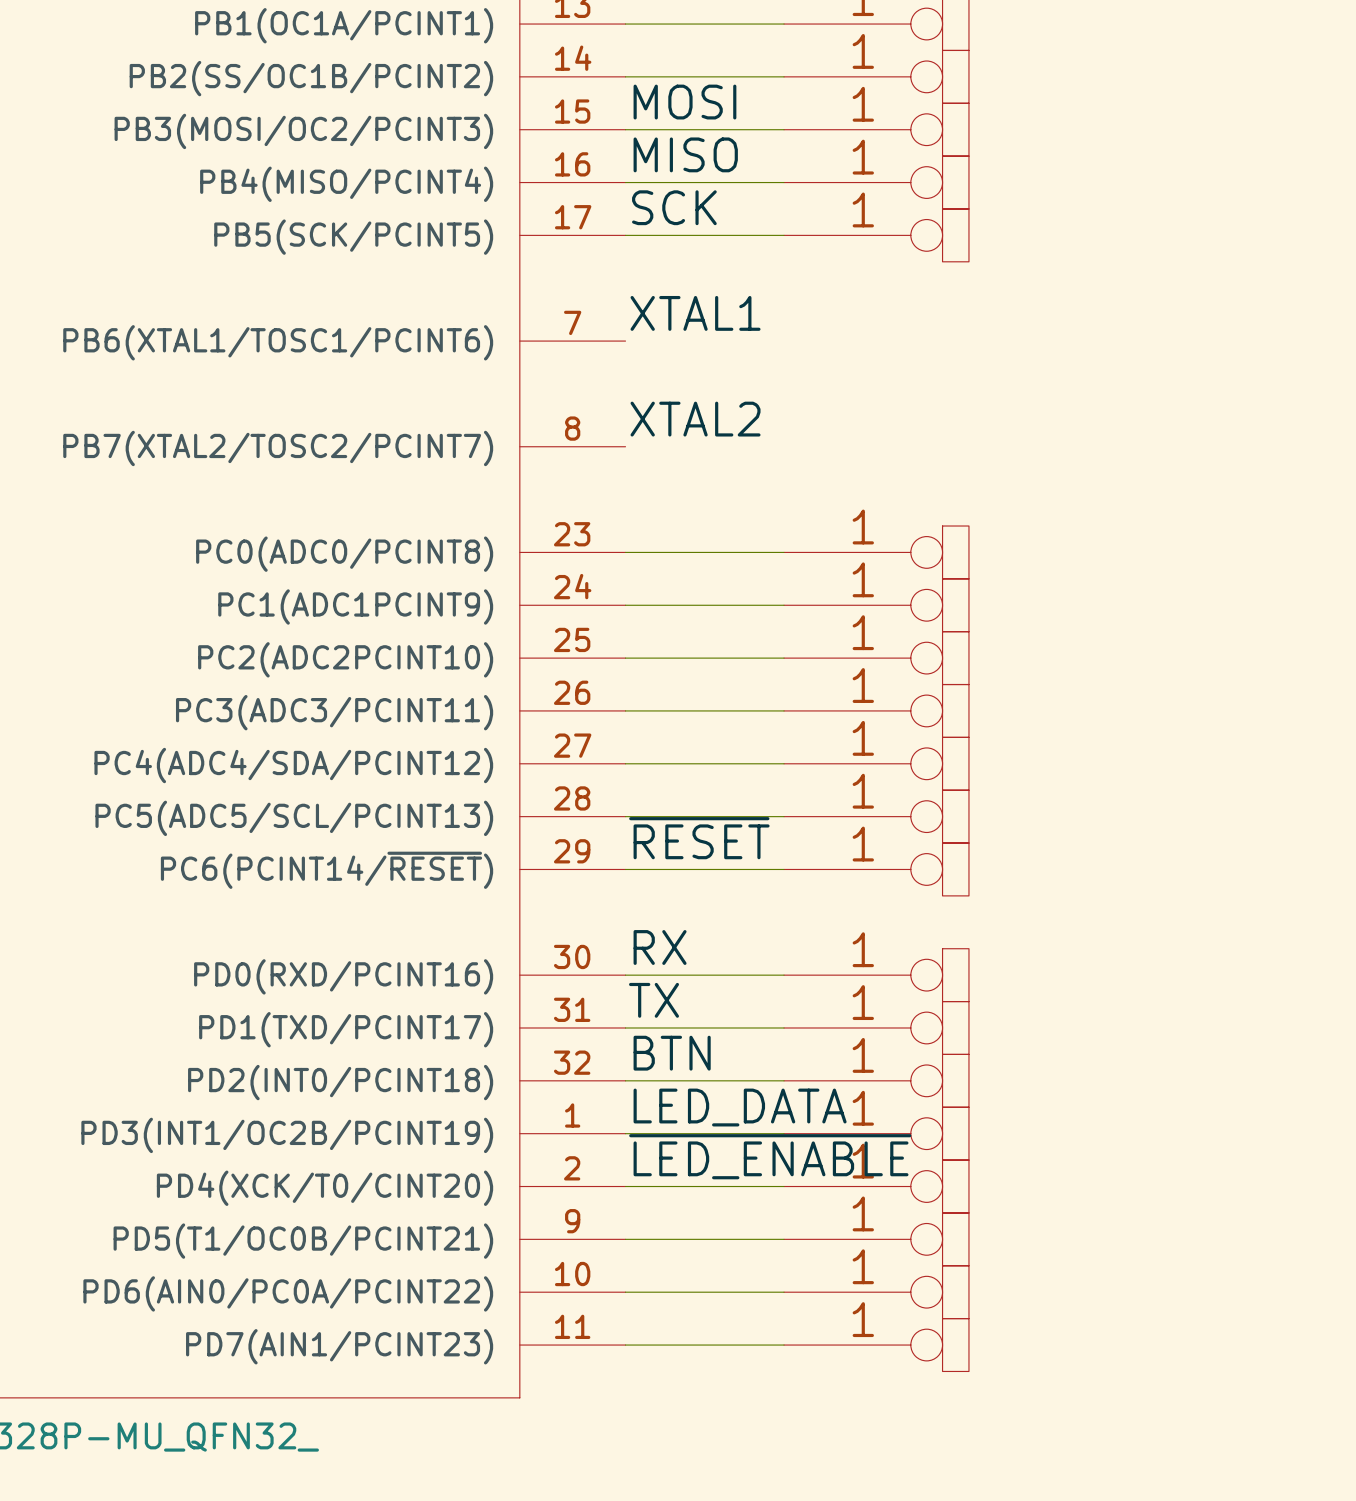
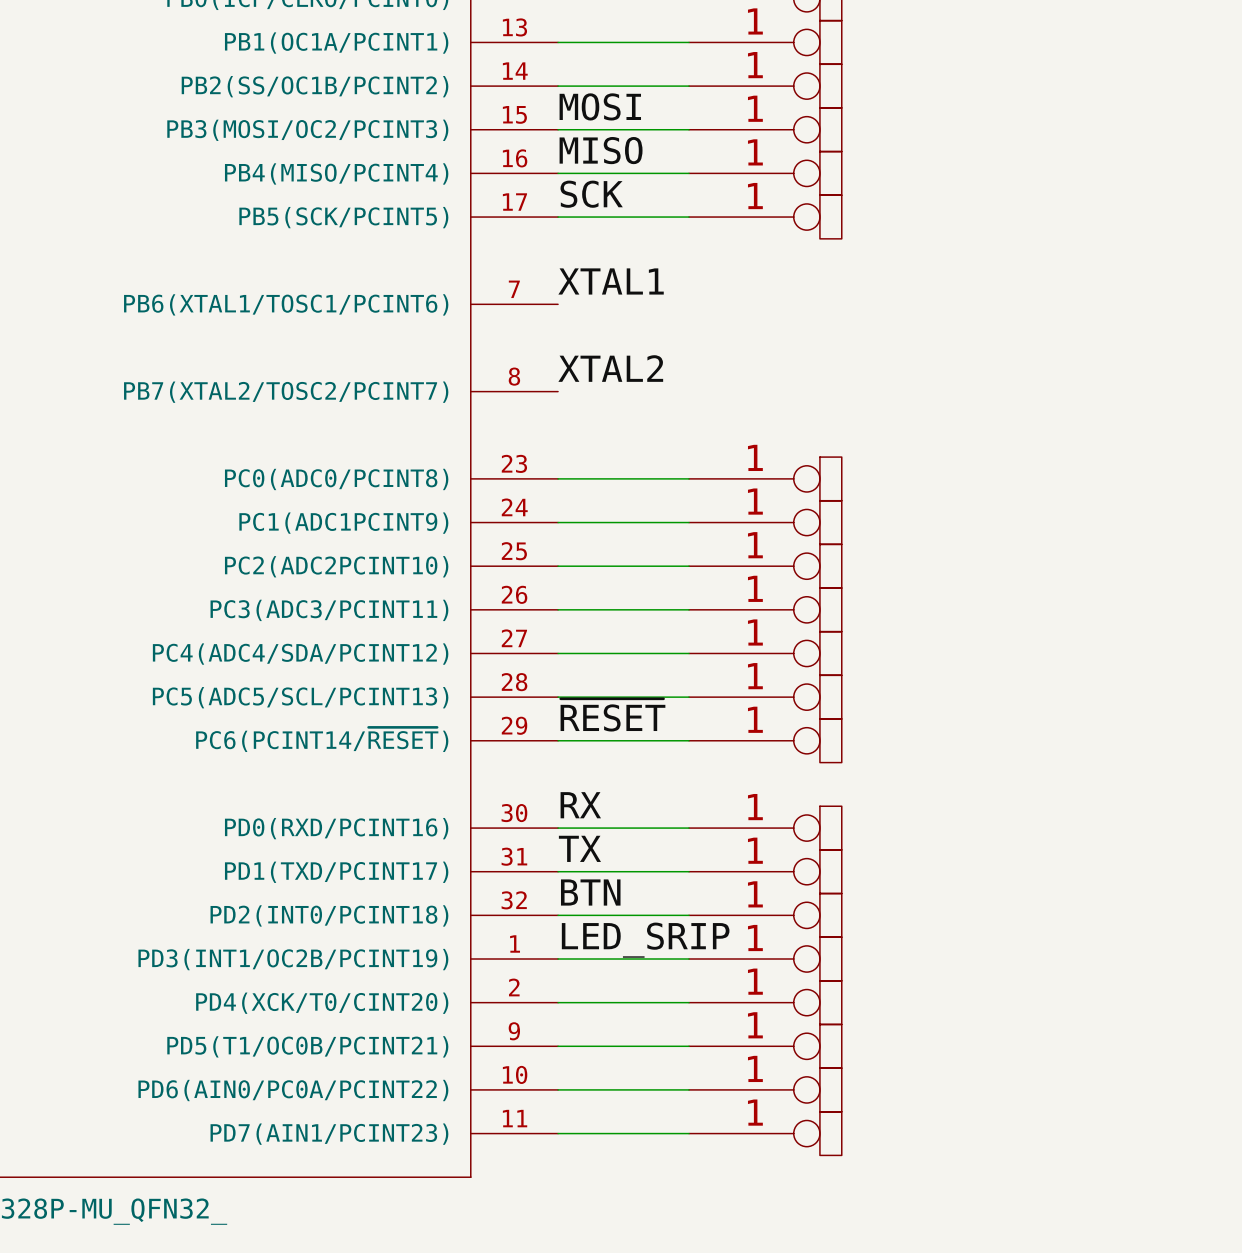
label: LED_DATA (740, 1107) -> LED_SRIP (645, 940)
label: ~{LED_ENABLE} (770, 1156) -> none

